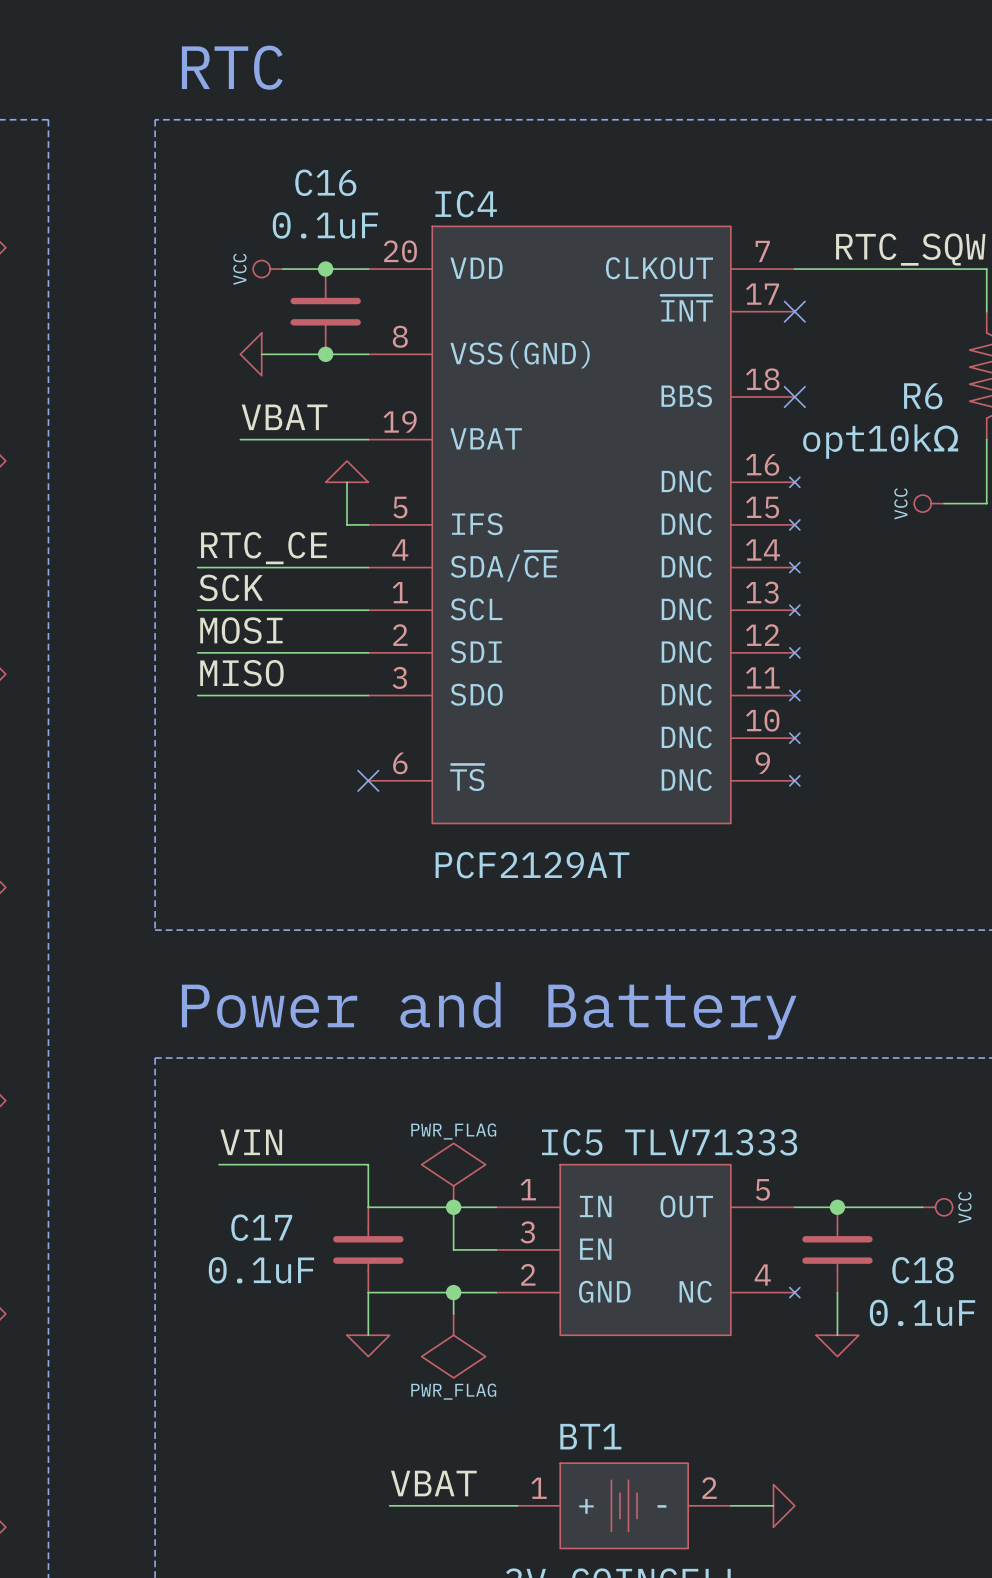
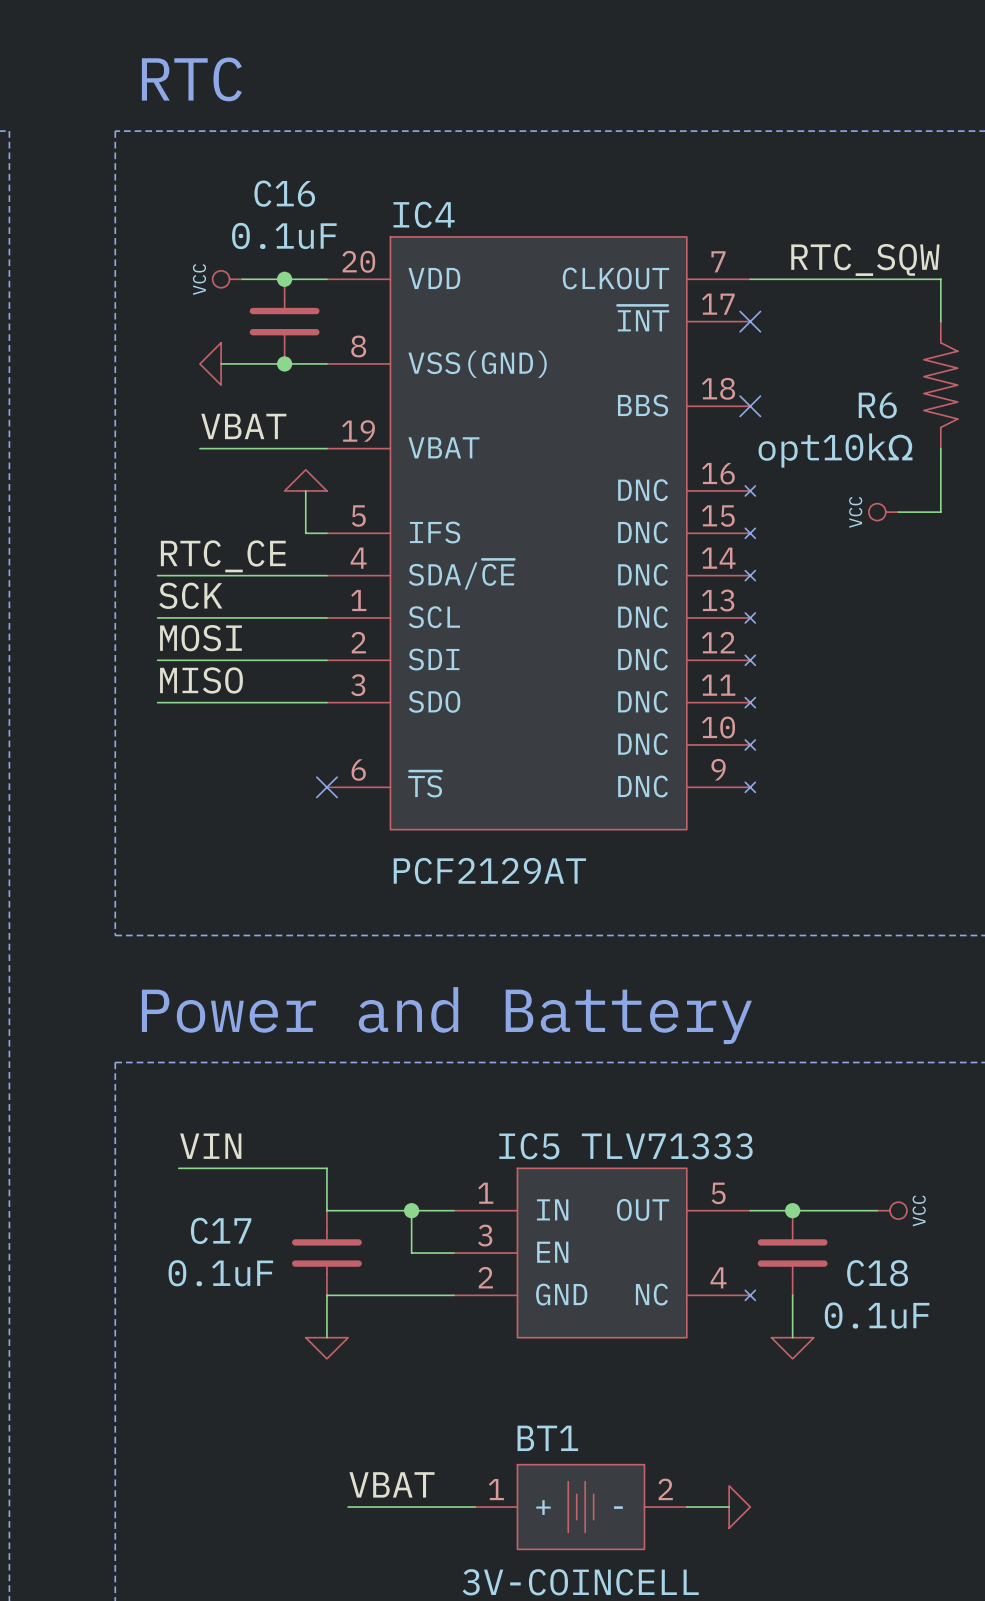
power symbol: PWR_FLAG (453, 1175) -> none
wire: (453, 1292) (453, 1313) -> none
junction: (453, 1292) -> none
power symbol: PWR_FLAG (453, 1345) -> none

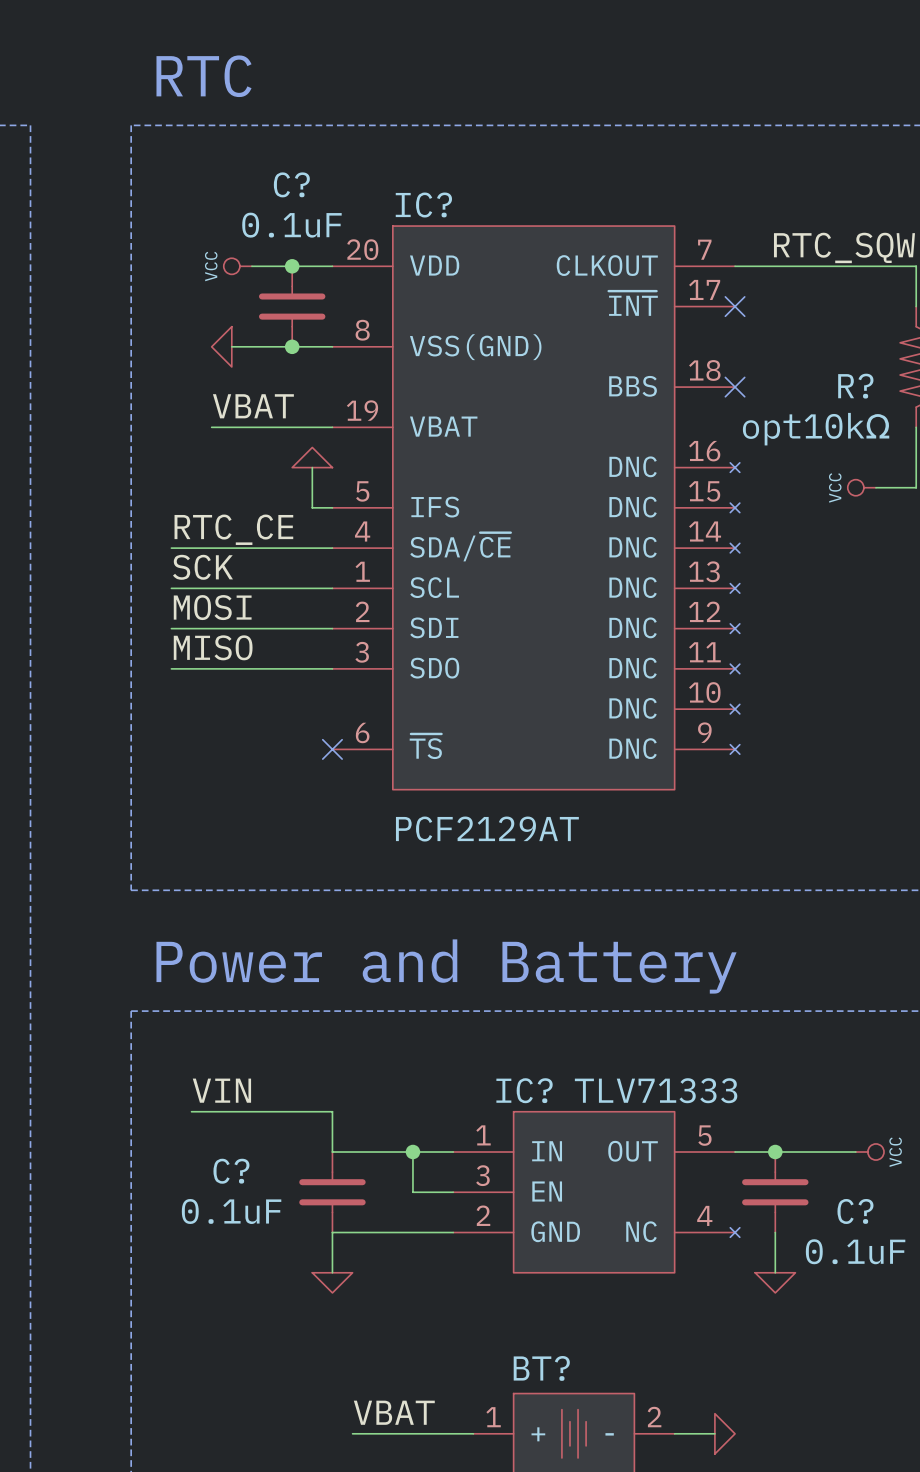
C16 name: C16 (284, 193) -> C? (291, 184)
IC4 name: IC4 (424, 214) -> IC? (423, 205)
R6 name: R6 (877, 405) -> R? (855, 386)
IC5 name: IC5 (529, 1146) -> IC? (524, 1090)
C17 name: C17 (221, 1230) -> C? (231, 1171)
C18 name: C18 (877, 1273) -> C? (855, 1211)
BT1 name: BT1 (547, 1438) -> BT? (541, 1368)

